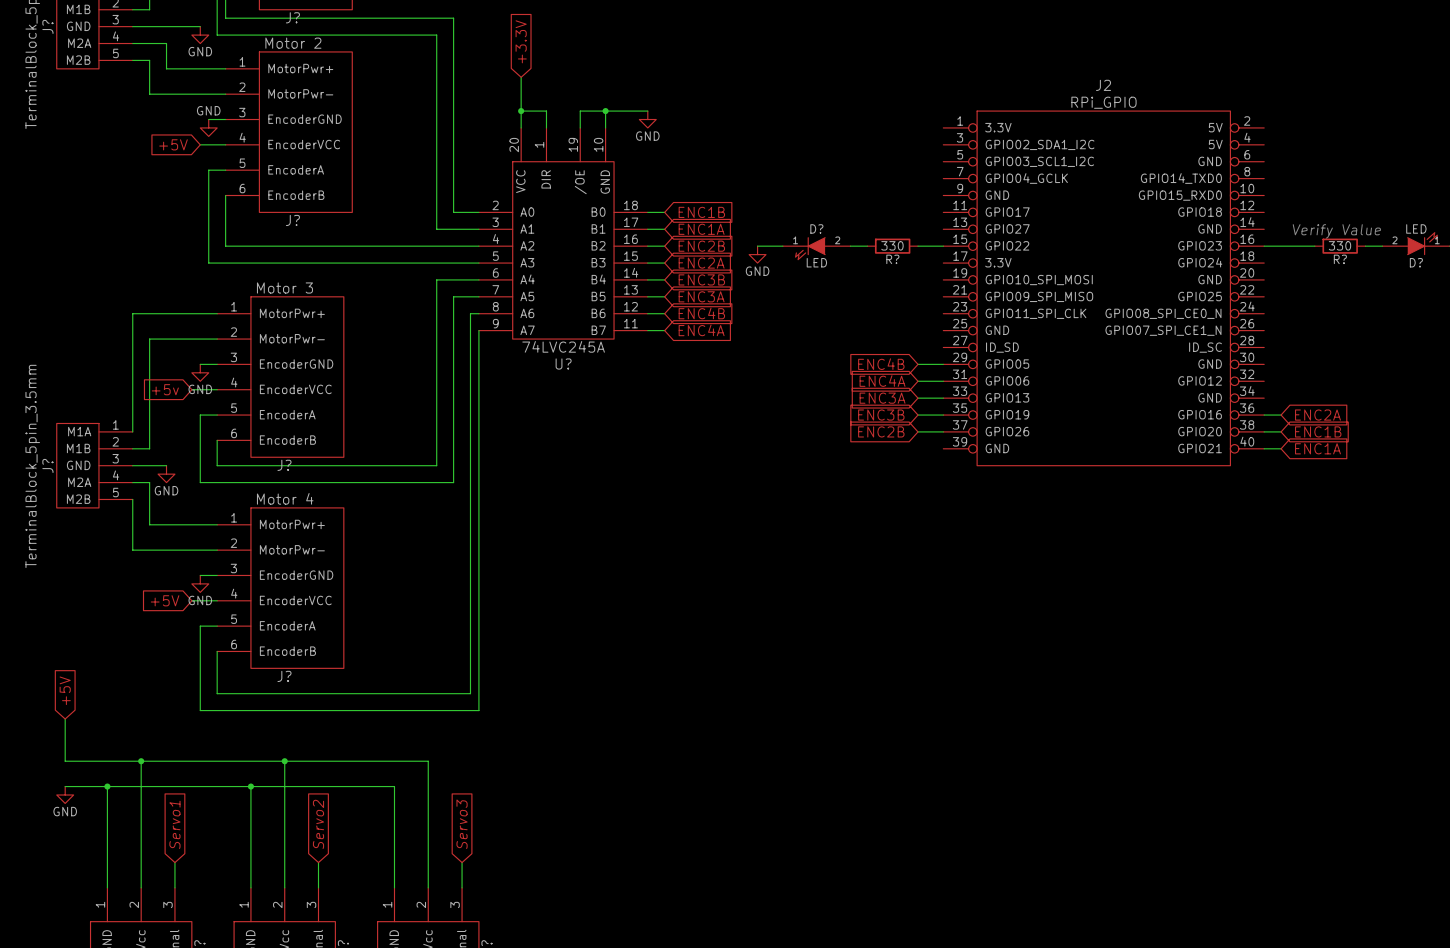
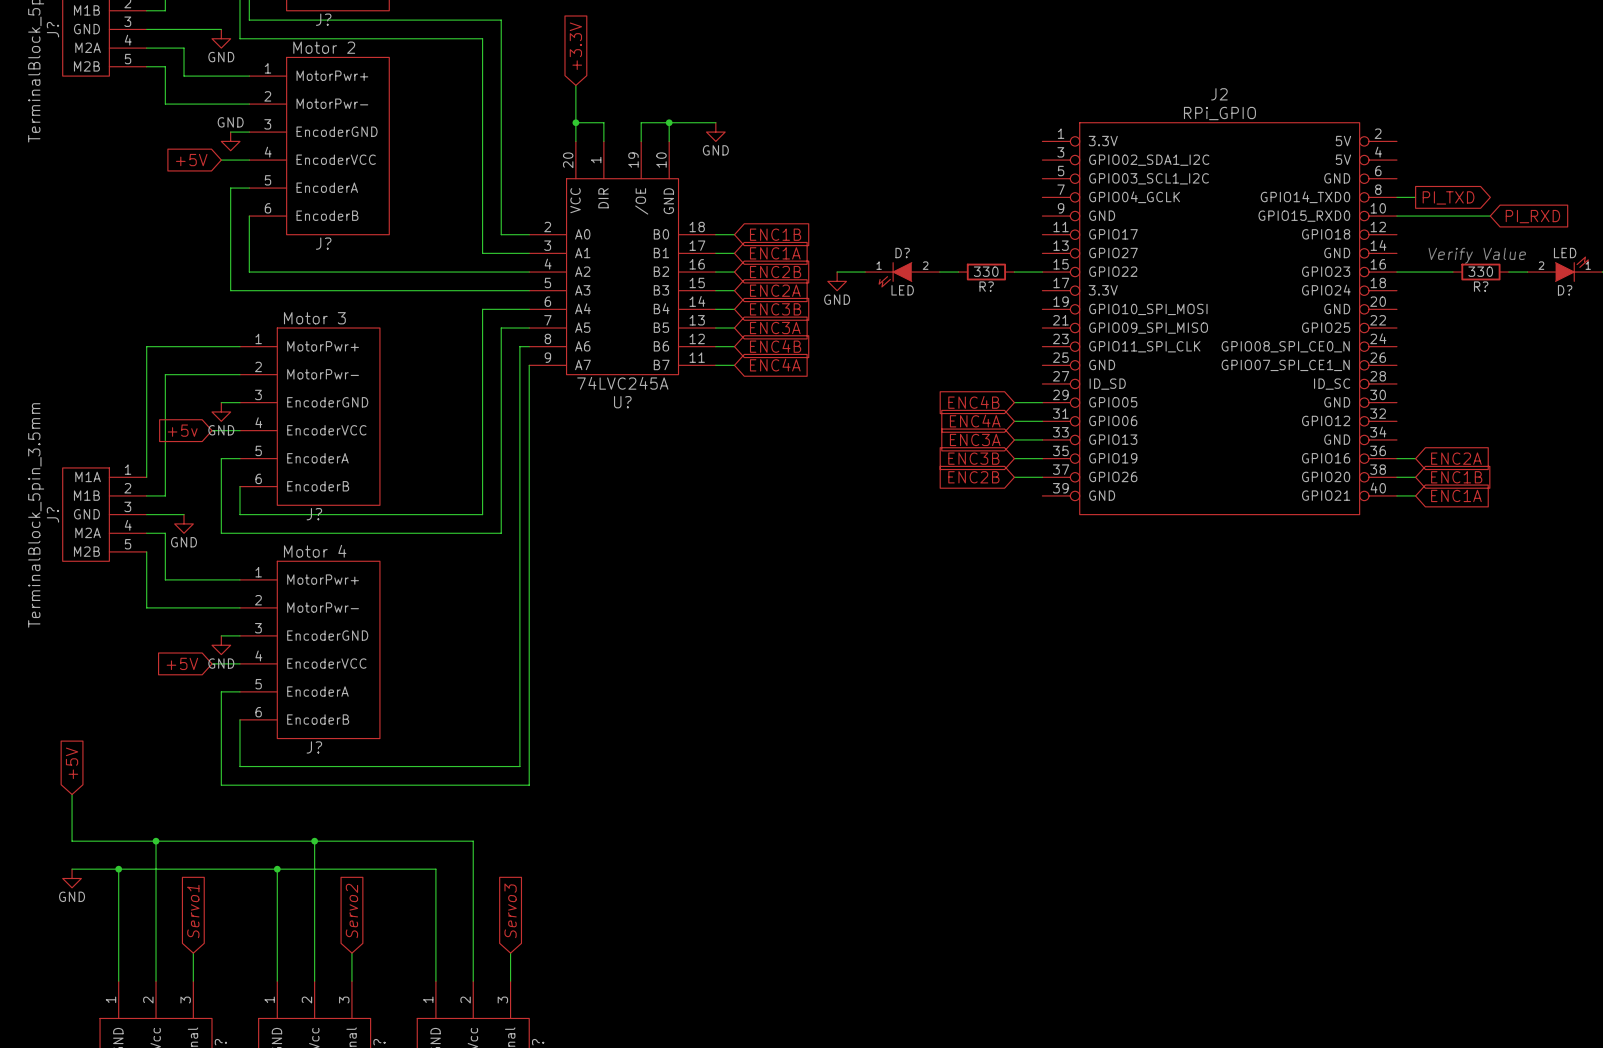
wire: none -> (1396, 197) (1415, 197)
global label: none -> PI_TXD (1448, 197)
wire: none -> (1396, 216) (1490, 216)
global label: none -> PI_RXD (1532, 216)

